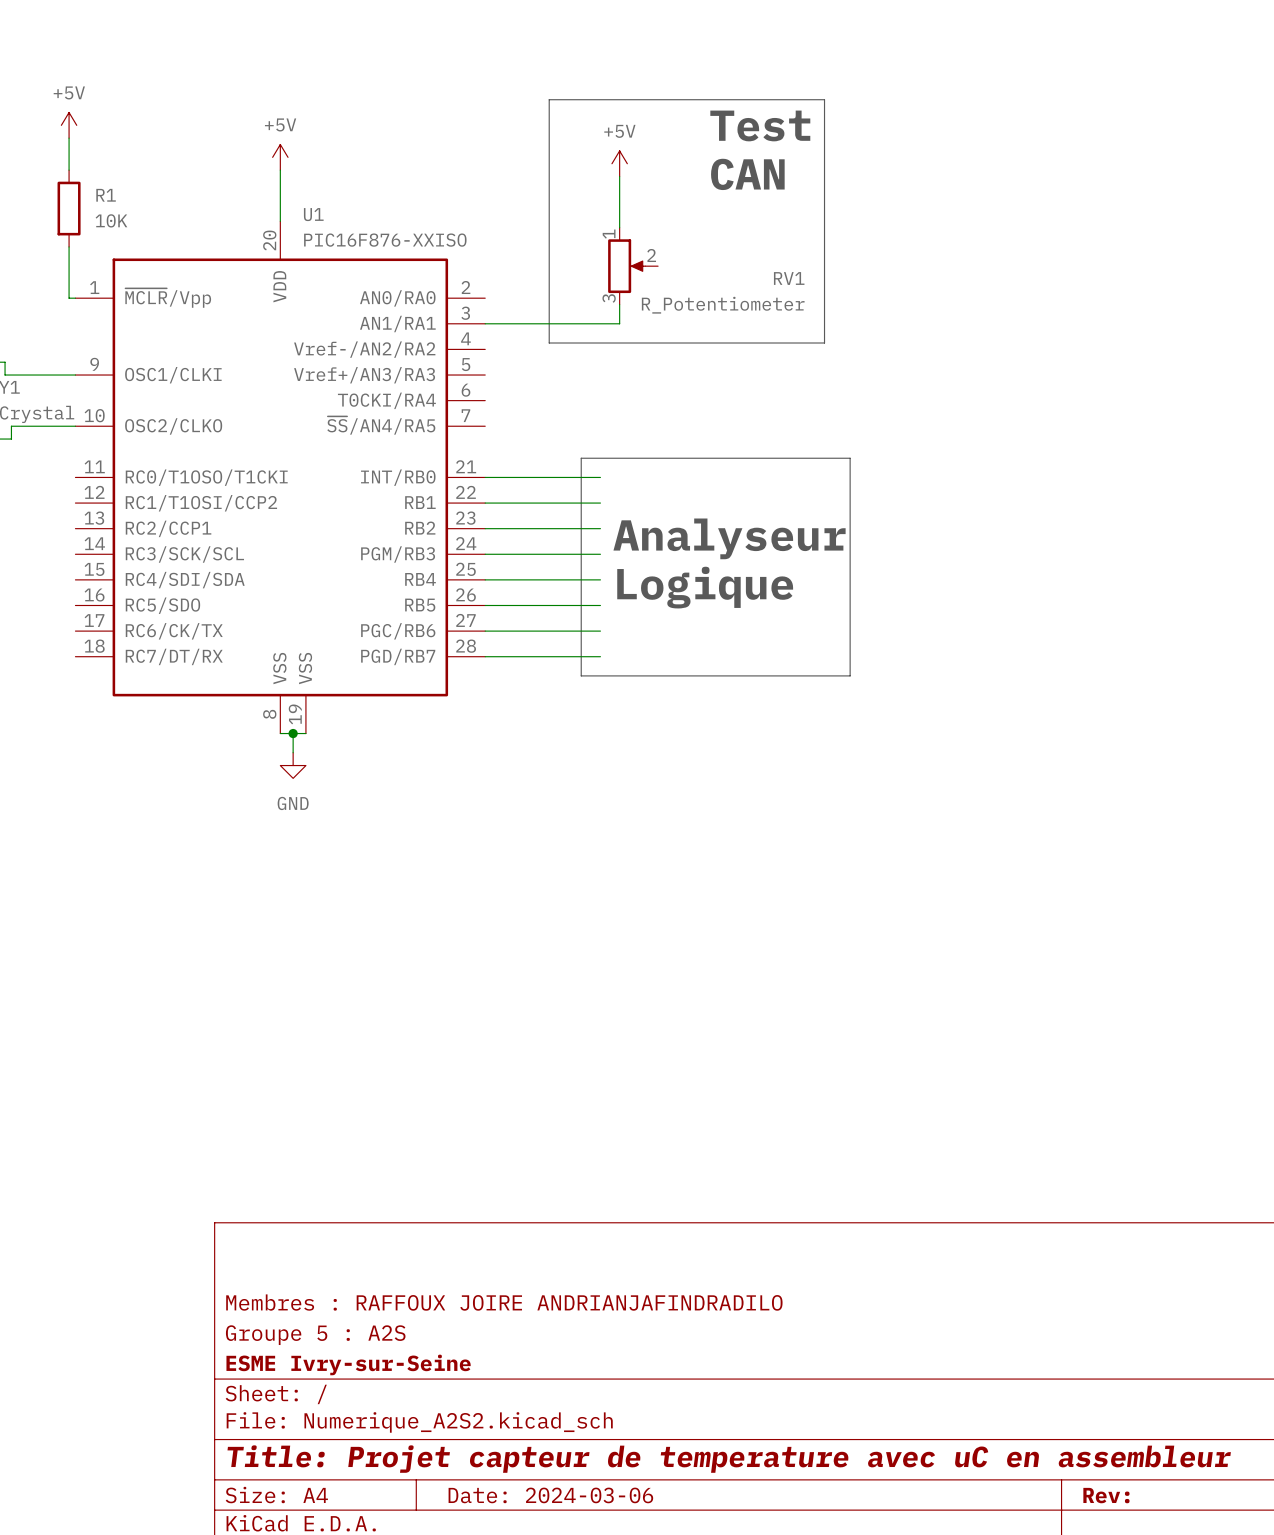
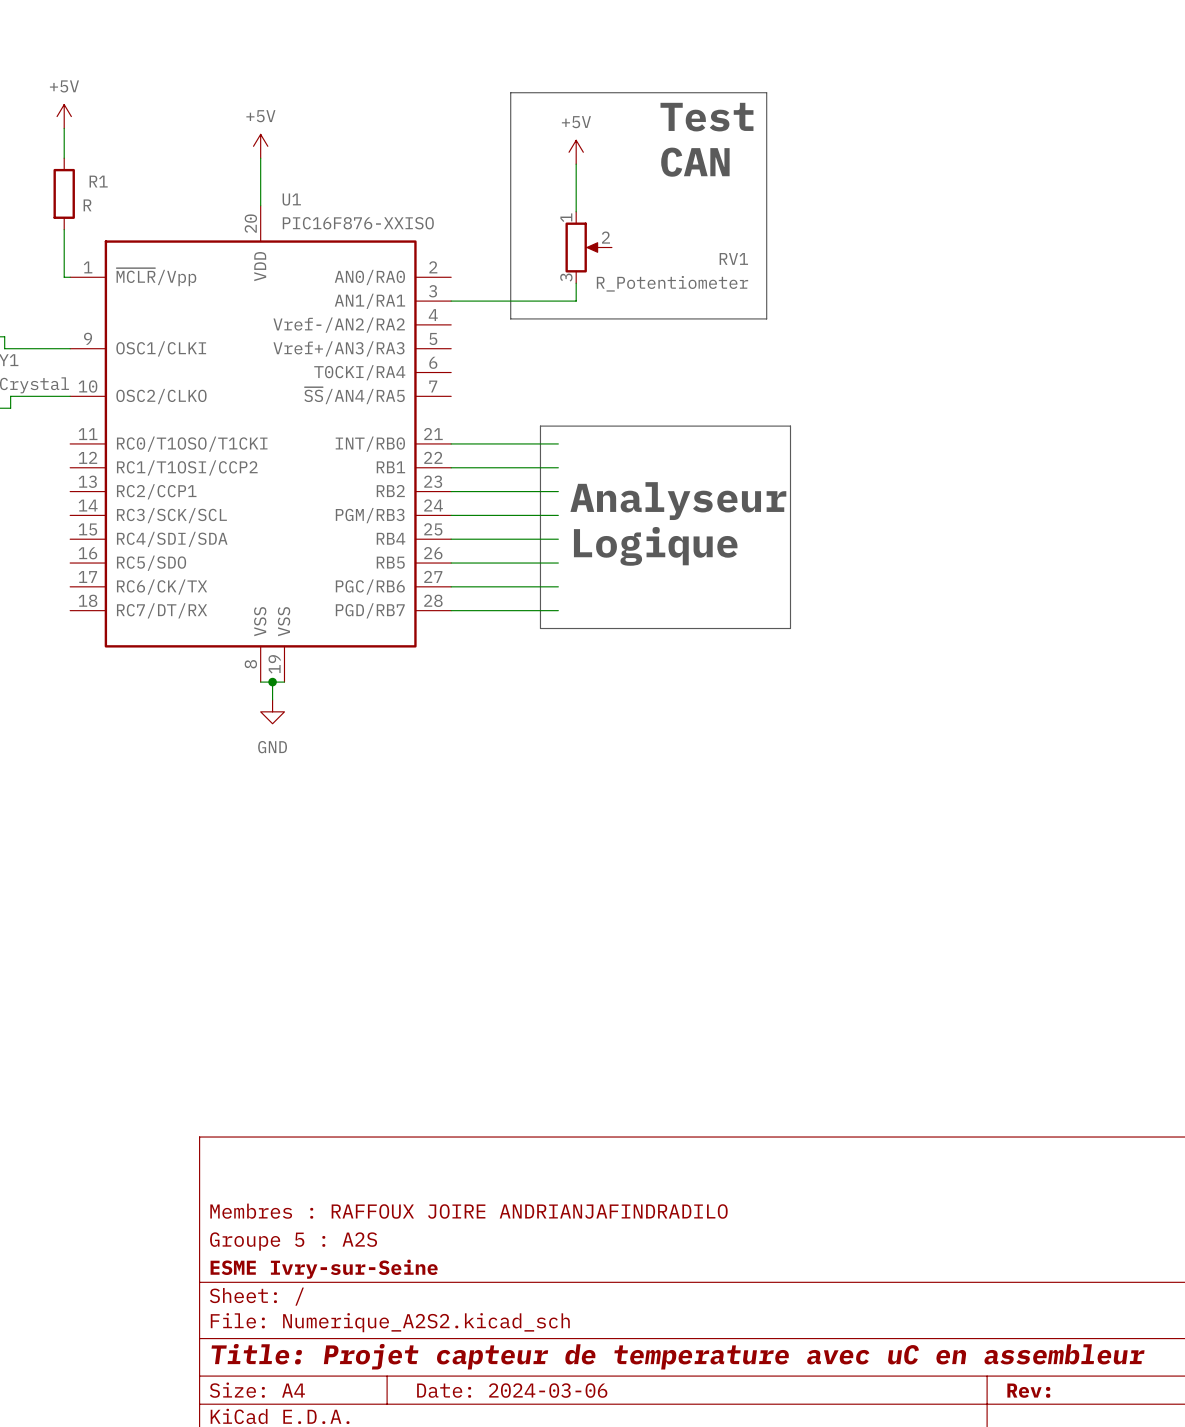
R1 value: 10K (111, 220) -> R (87, 205)

